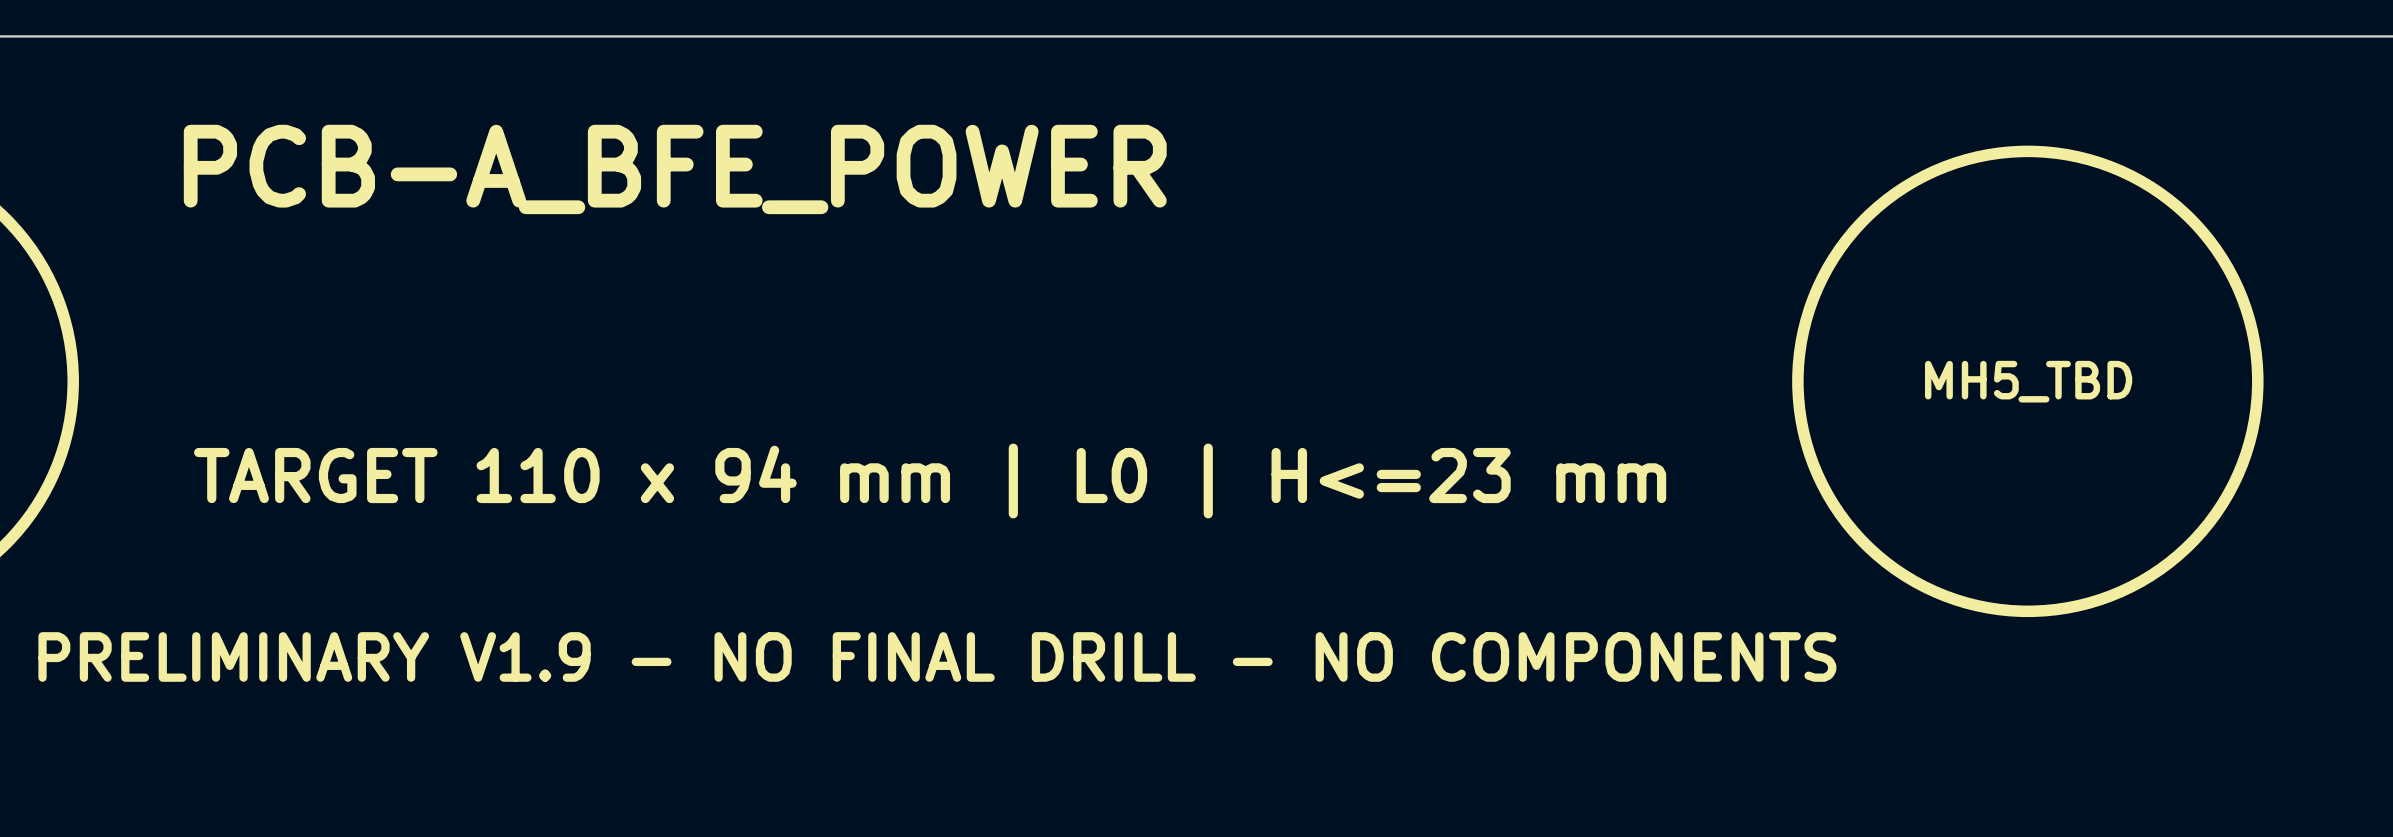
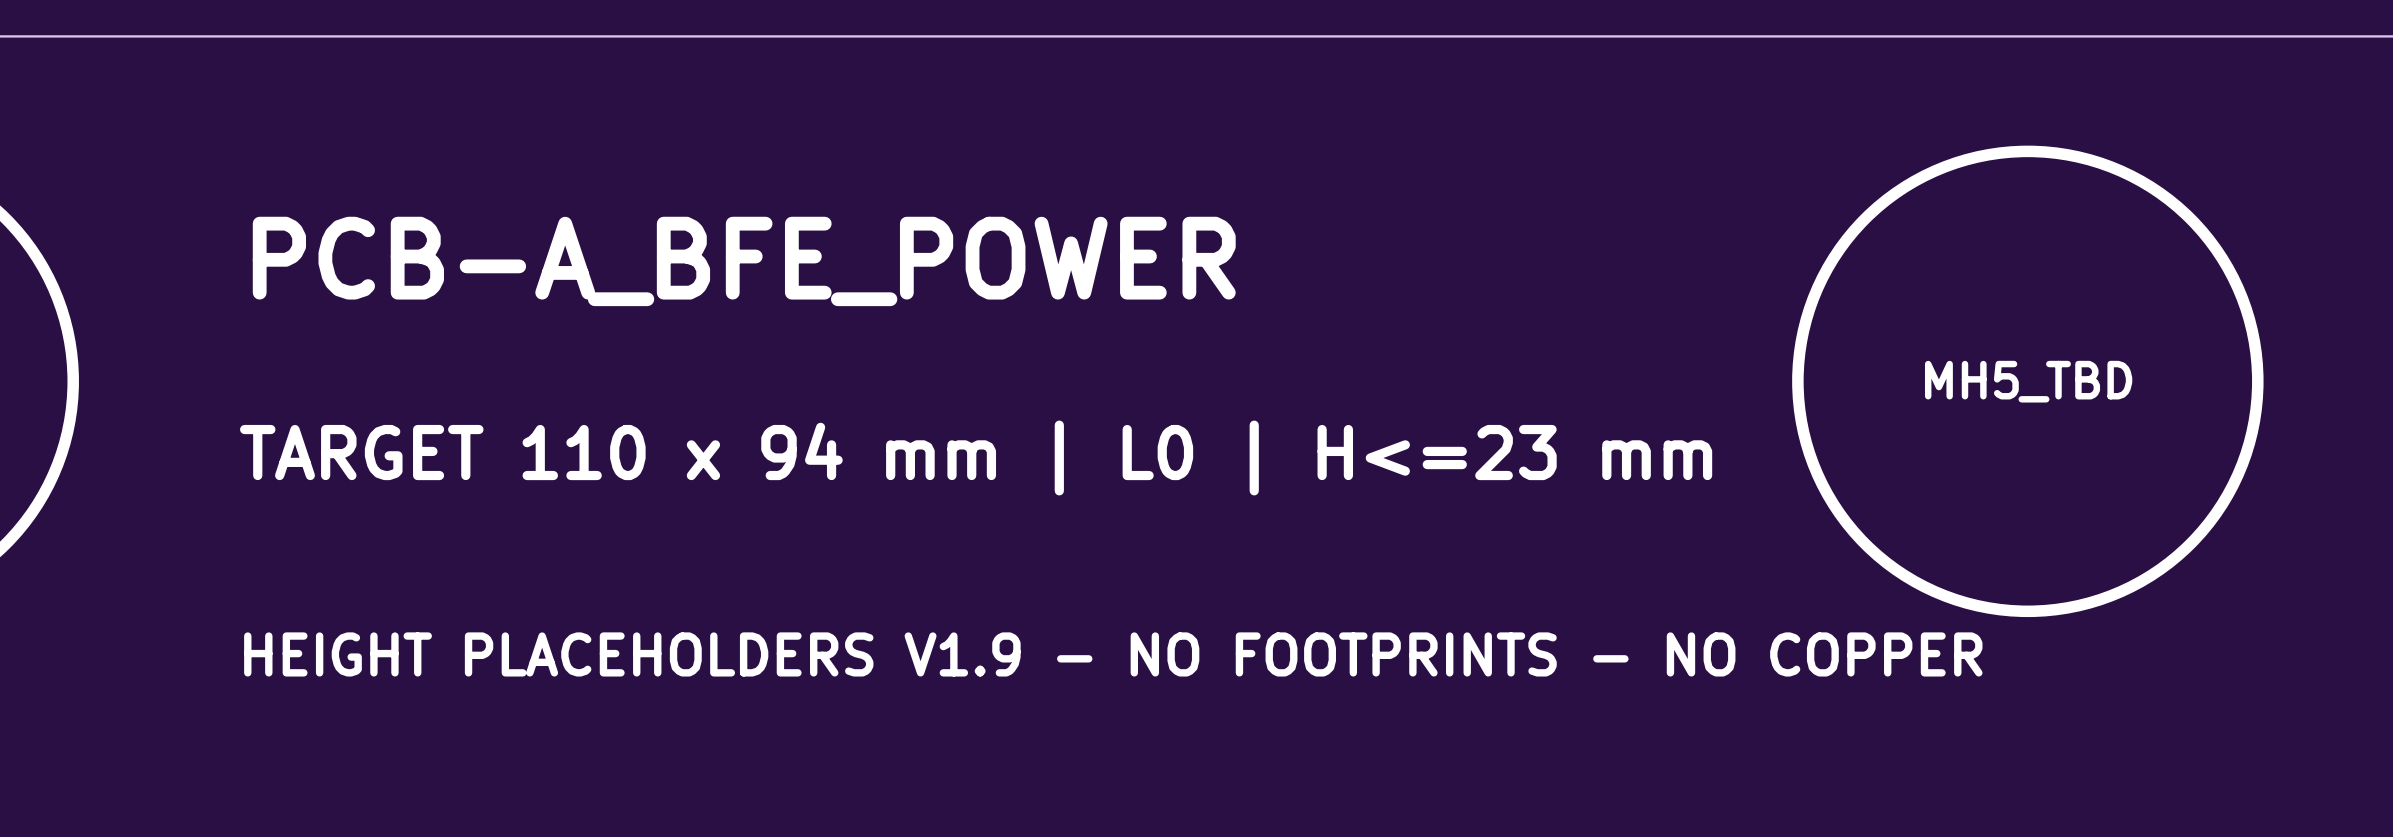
text position: PCB-A_BFE_POWER (675, 169) -> PCB-A_BFE_POWER (744, 261)
text position: TARGET 110 x 94 mm | L0 | H<=23 mm (930, 481) -> TARGET 110 x 94 mm | L0 | H<=23 mm (976, 458)
text: none -> HEIGHT PLACEHOLDERS V1.9 - NO FOOTPRINTS - NO COPPER (1113, 654)
text: PRELIMINARY V1.9 - NO FINAL DRILL - NO COMPONENTS (937, 656) -> none

